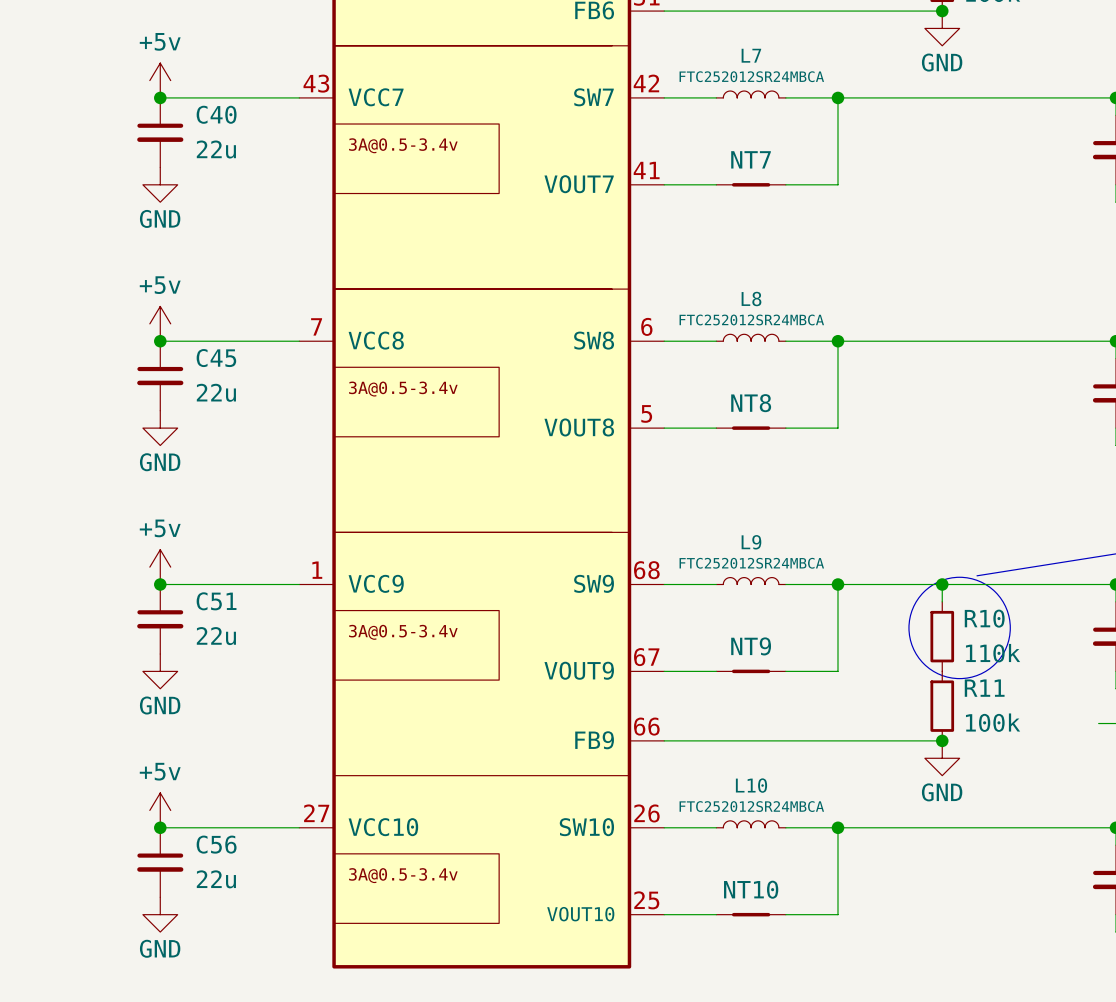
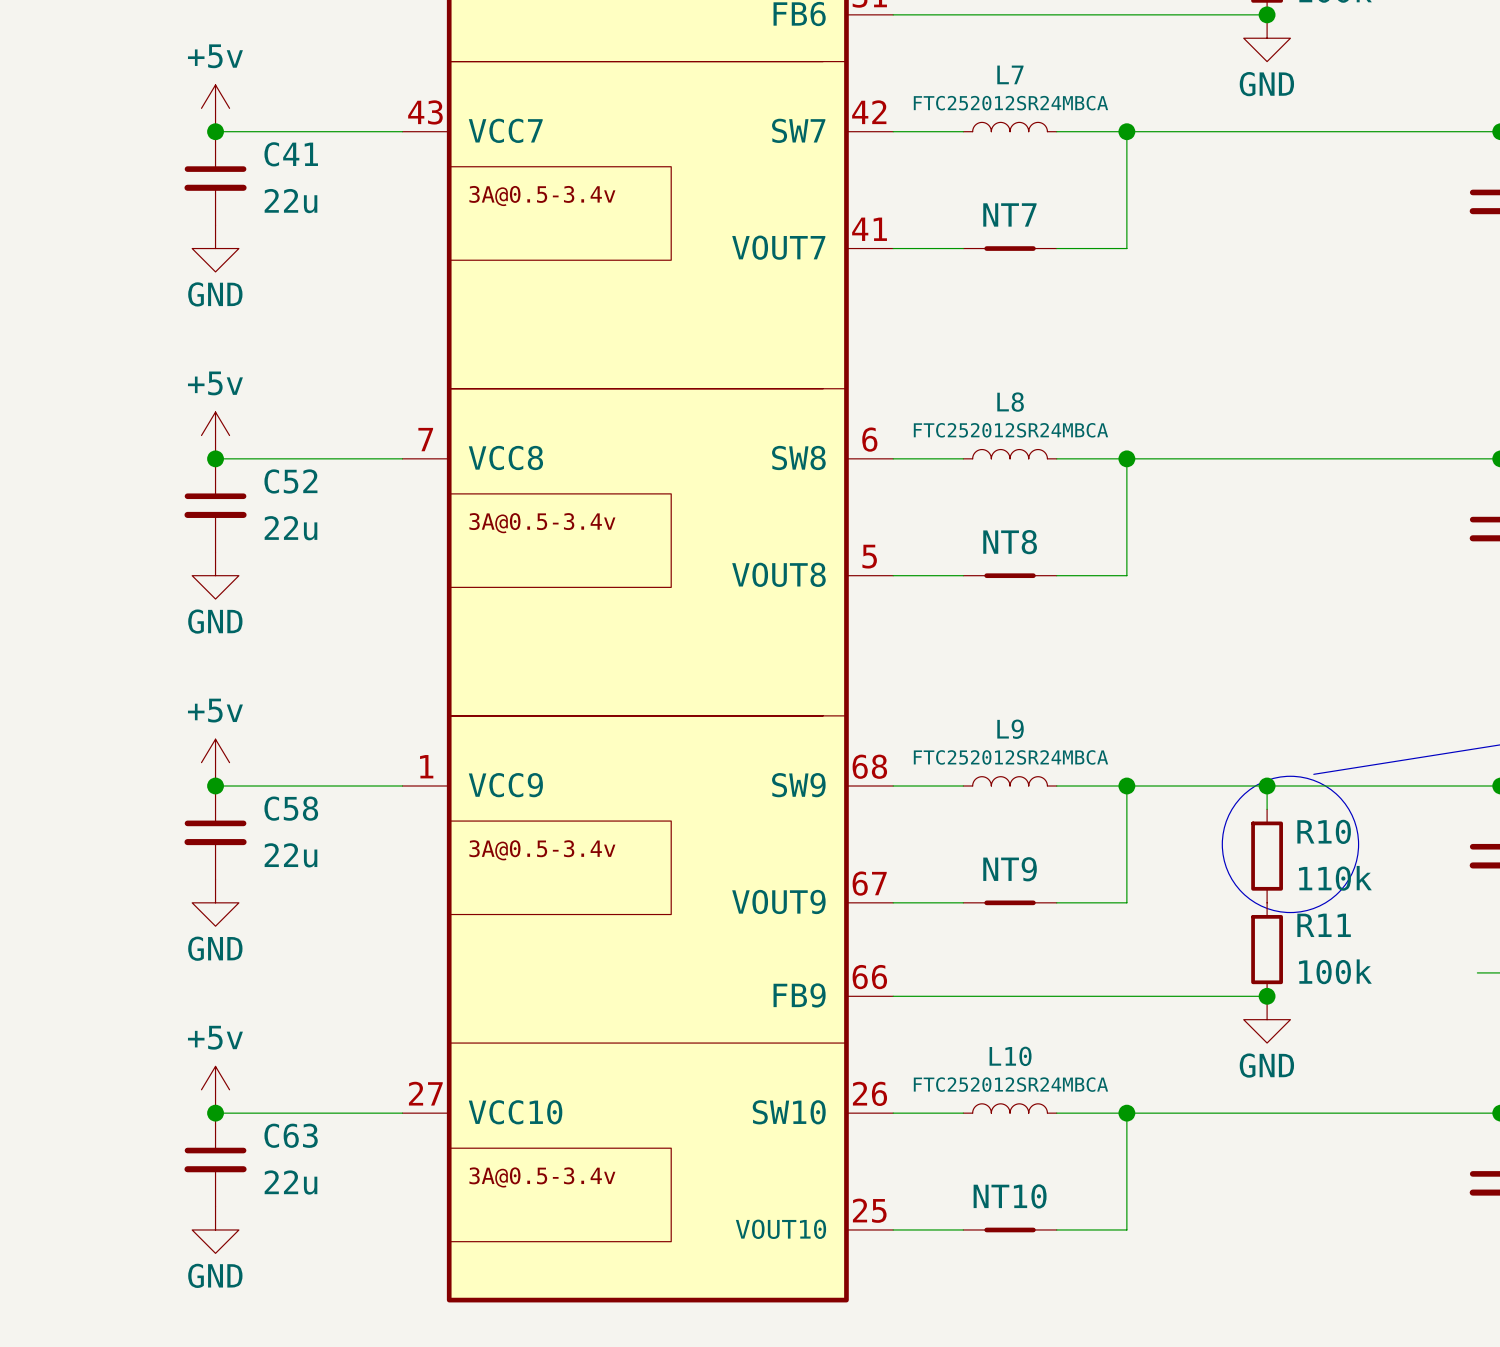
C40 name: C40 (216, 114) -> C41 (291, 154)
C45 name: C45 (216, 358) -> C52 (290, 481)
C51 name: C51 (216, 601) -> C58 (291, 808)
C56 name: C56 (216, 844) -> C63 (291, 1135)

